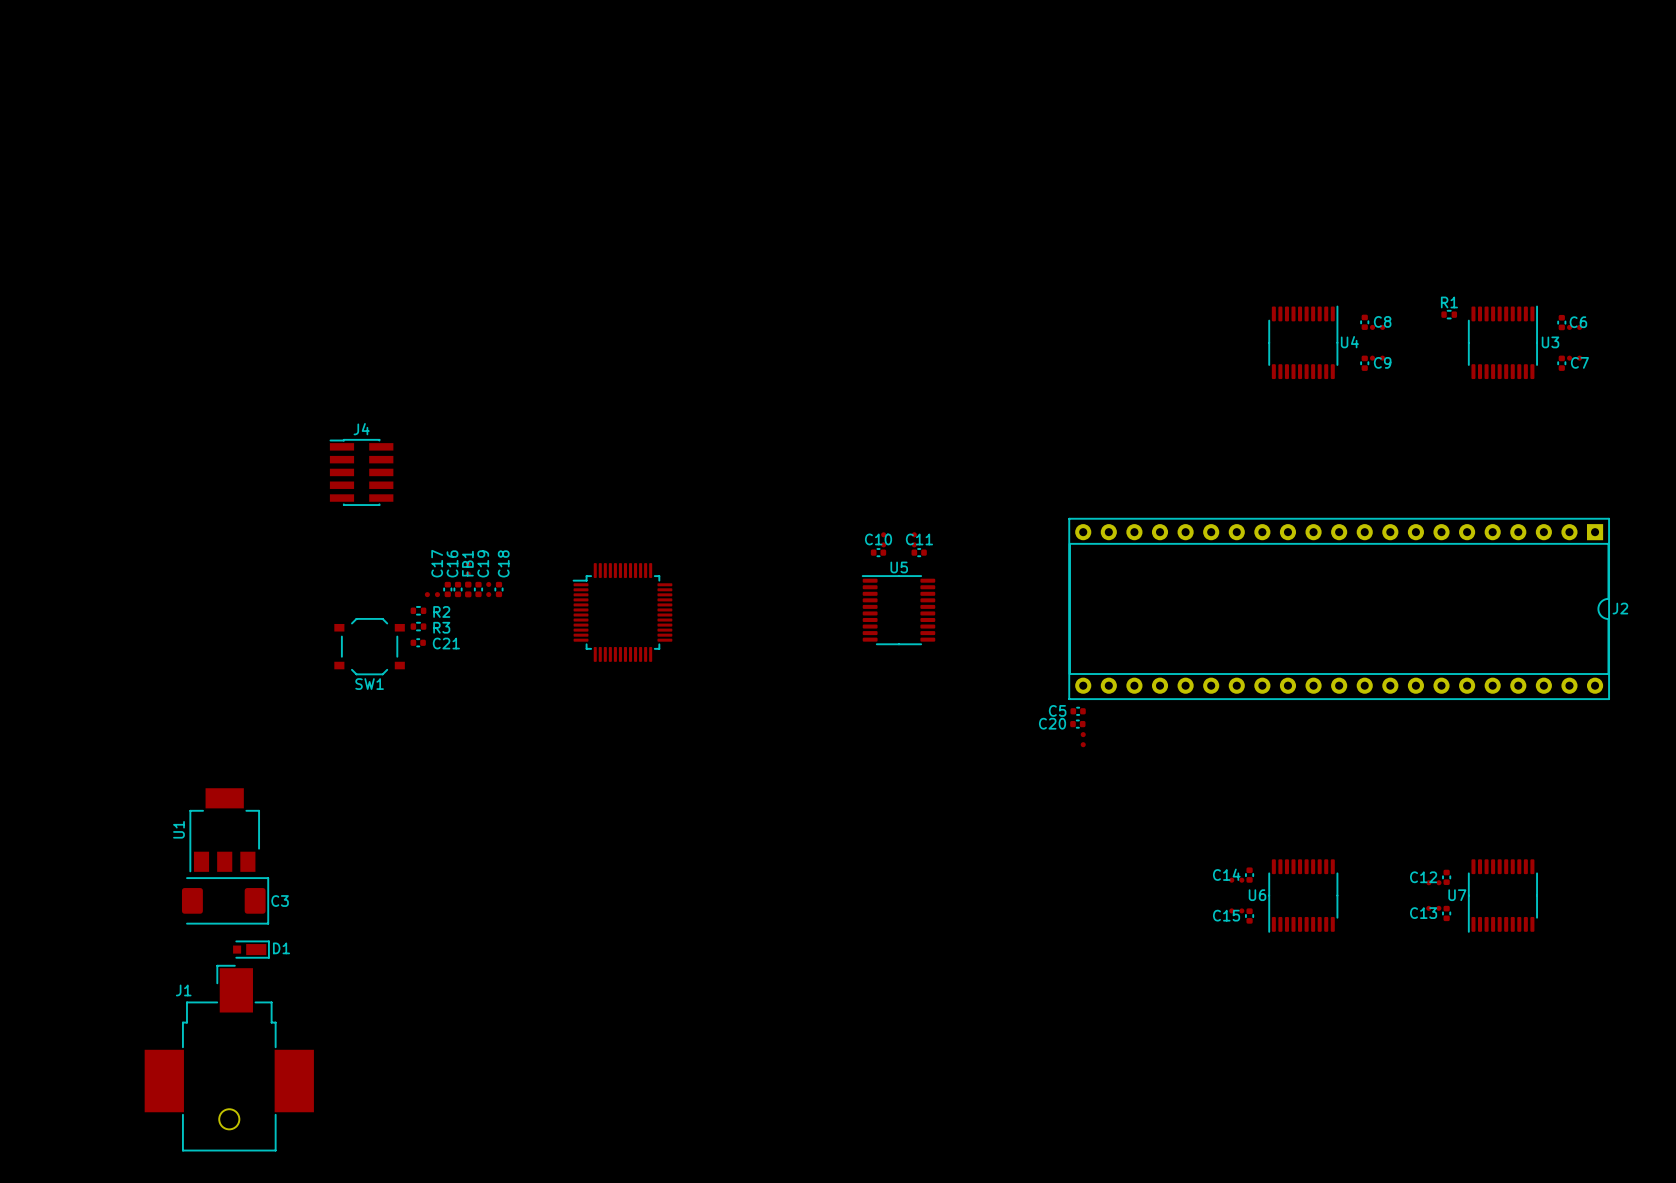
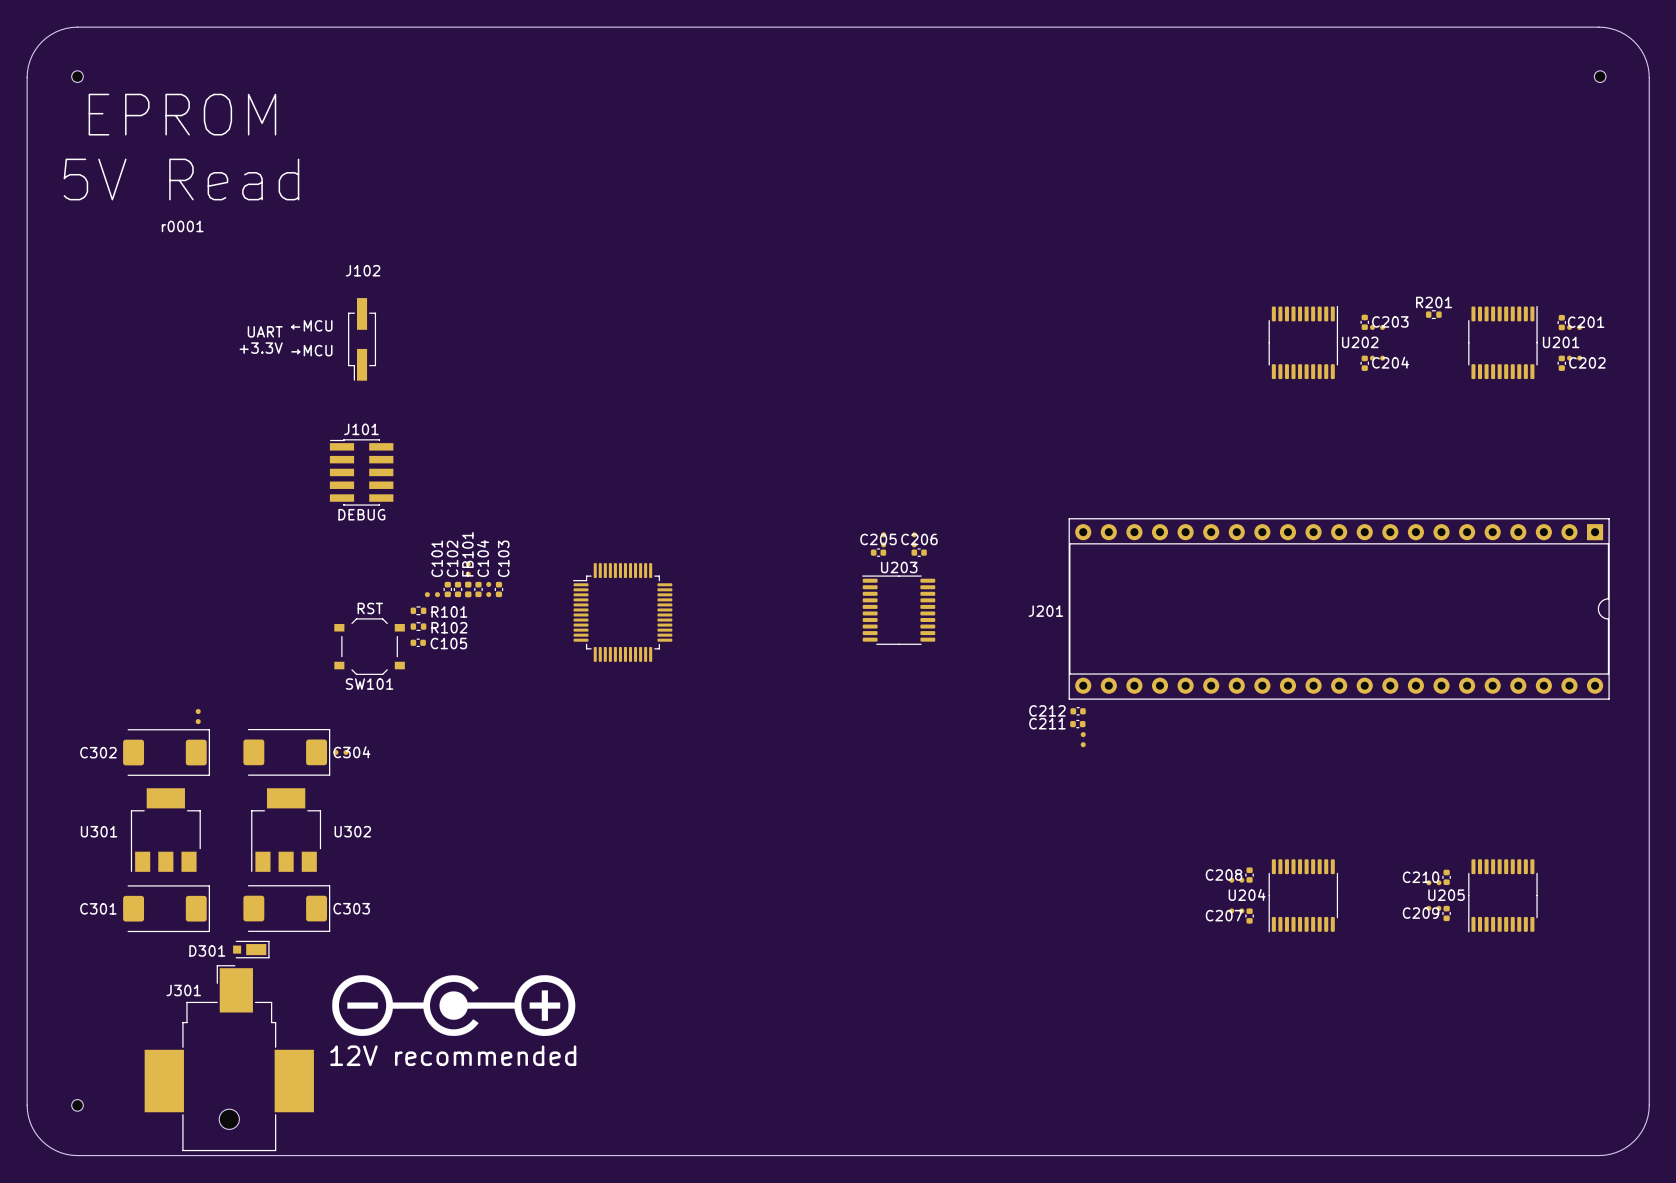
board edge: none -> (77, 27) (1598, 27) (1615, 29) (1625, 34) (1641, 50) (1646, 60) (1649, 77) (1649, 1105) (1646, 1121) (1641, 1132) (1625, 1147) (1615, 1152) (1598, 1155) (77, 1155) (60, 1152) (50, 1147) (34, 1132) (29, 1121) (27, 1105) (27, 77) (29, 60) (41, 41) (60, 29) (77, 27)
part: none -> (77, 76)
part: none -> (1600, 76)
text: none -> EPROM (182, 114)
text: none -> 5V Read (181, 179)
text: none -> r0001 (182, 226)
R201: none -> (1433, 314)
R1: (1449, 314) -> none
C8 name: C8 (1382, 321) -> C203 (1390, 321)
C6 name: C6 (1578, 322) -> C201 (1586, 322)
text: none -> ←MCU (311, 325)
text: none -> UART (265, 331)
J102: none -> (362, 339)
U4 name: U4 (1349, 342) -> U202 (1360, 342)
U3 name: U3 (1550, 342) -> U201 (1561, 342)
text: none -> +3.3V (261, 348)
text: none -> →MCU (311, 350)
C9 name: C9 (1382, 362) -> C204 (1390, 362)
C7 name: C7 (1579, 362) -> C202 (1587, 362)
J4 name: J4 (361, 429) -> J101 (361, 429)
J4 value: none -> DEBUG (361, 514)
C10 name: C10 (878, 539) -> C205 (878, 539)
C11 name: C11 (919, 539) -> C206 (919, 539)
C17 name: C17 (437, 563) -> C101 (437, 558)
C16 name: C16 (452, 563) -> C102 (452, 558)
FB1 name: FB1 (467, 563) -> FB101 (467, 554)
C19 name: C19 (483, 563) -> C104 (482, 558)
C18 name: C18 (503, 563) -> C103 (503, 558)
U5 name: U5 (899, 567) -> U203 (899, 567)
SW1 value: none -> RST (370, 608)
J2 name: J2 (1620, 608) -> J201 (1045, 611)
R2 name: R2 (441, 611) -> R101 (449, 611)
R3 name: R3 (441, 627) -> R102 (449, 627)
C21 name: C21 (446, 643) -> C105 (448, 643)
SW1 name: SW1 (369, 684) -> SW101 (369, 684)
C5 name: C5 (1057, 710) -> C212 (1047, 710)
part: none -> (198, 716)
C20 name: C20 (1052, 723) -> C211 (1047, 723)
C302: none -> (166, 752)
C304: none -> (286, 752)
part: none -> (340, 752)
U301: none -> (165, 830)
U1: (224, 830) -> none
U302: none -> (286, 830)
C14 name: C14 (1226, 874) -> C208 (1223, 874)
C12 name: C12 (1423, 877) -> C210 (1421, 877)
U6 name: U6 (1257, 895) -> U204 (1247, 894)
U7 name: U7 (1457, 895) -> U205 (1446, 895)
C3: (225, 900) -> none
C301: none -> (166, 908)
C303: none -> (286, 908)
C13 name: C13 (1423, 913) -> C209 (1421, 913)
C15 name: C15 (1226, 915) -> C207 (1224, 915)
D1 name: D1 (281, 948) -> D301 (207, 950)
drawing: none -> [332, 975, 576, 1037]
J1 name: J1 (183, 990) -> J301 (183, 990)
text: none -> 12V recommended (453, 1055)
part: none -> (77, 1105)

